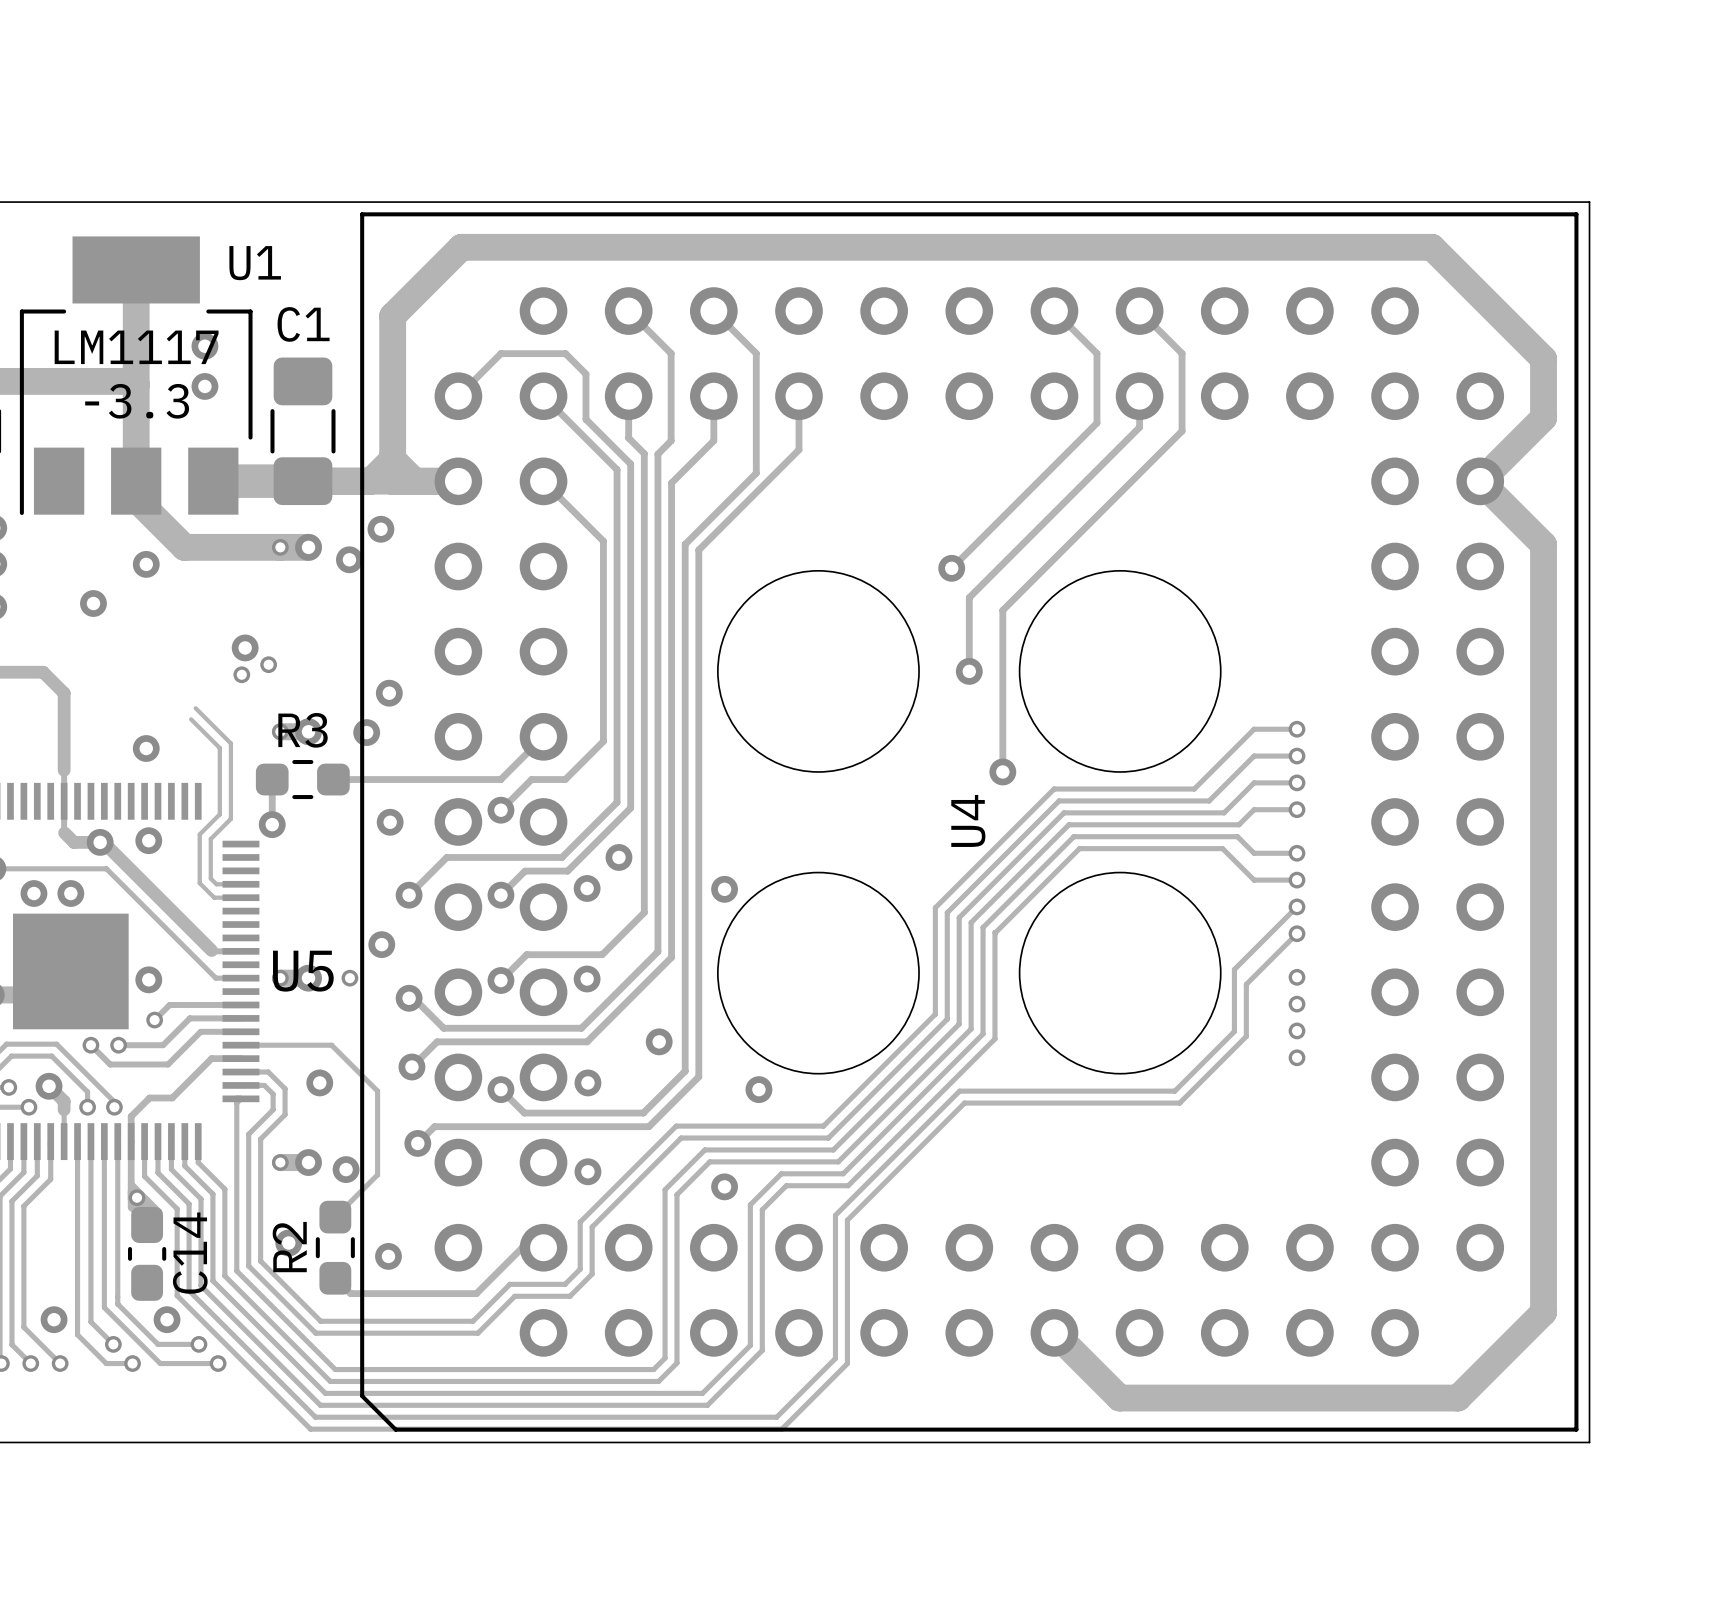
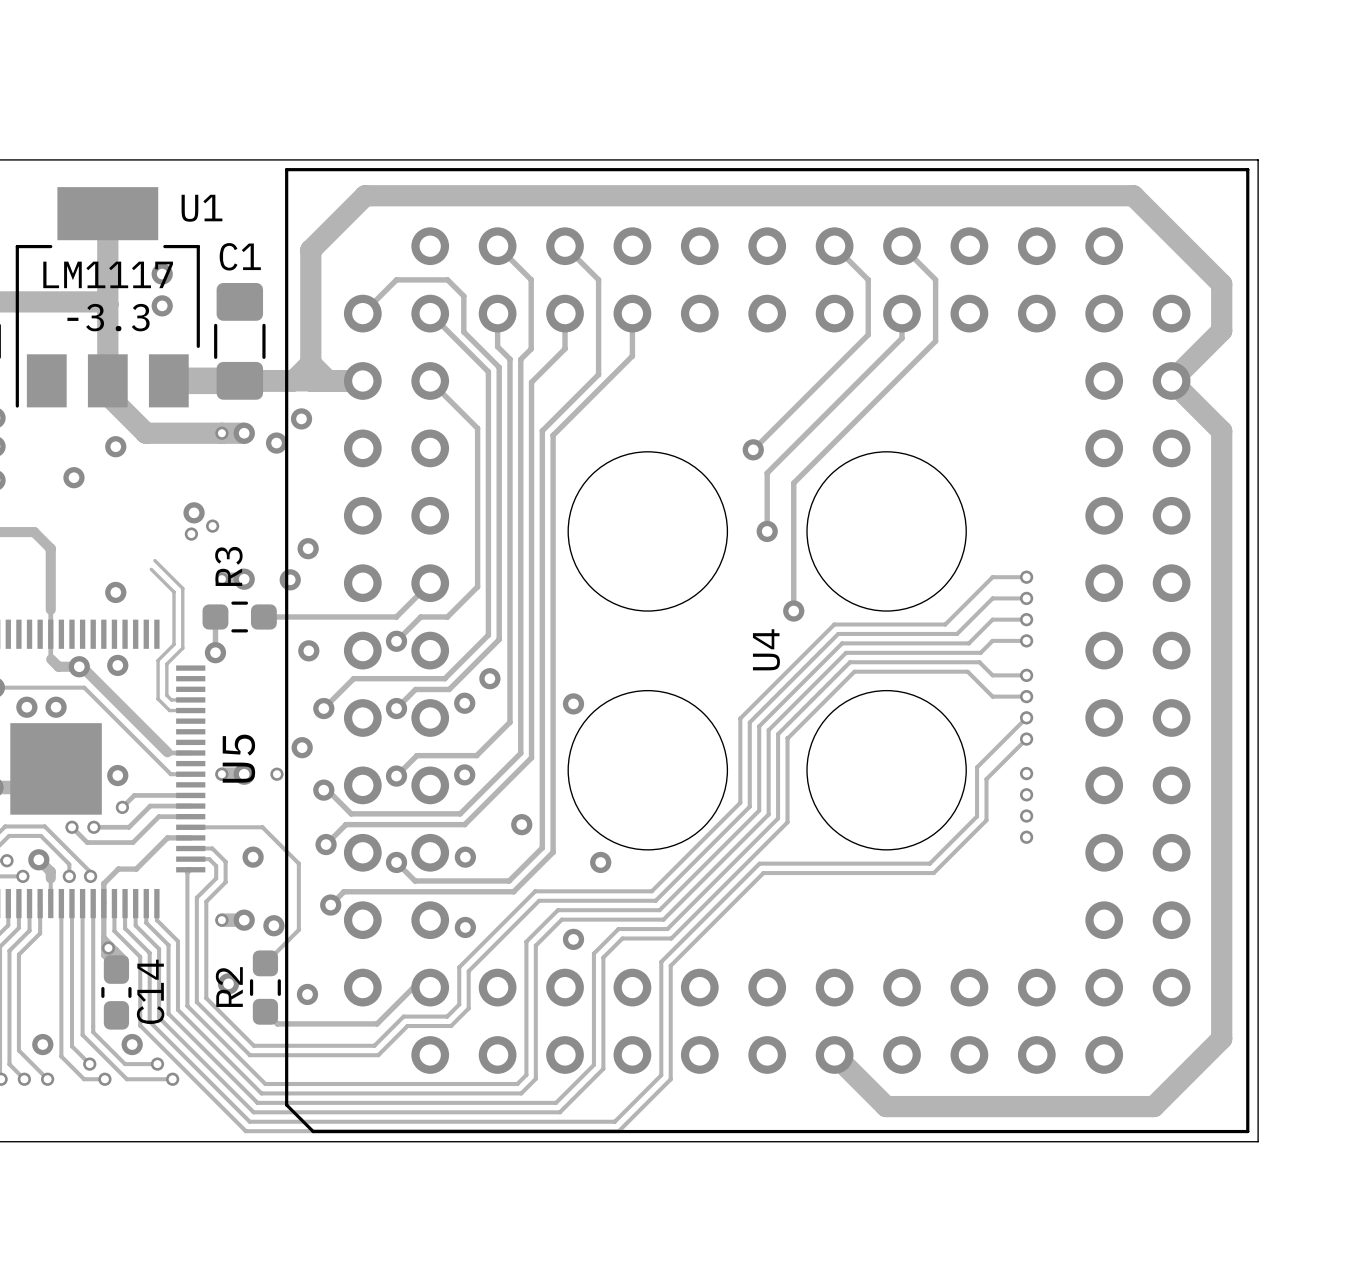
R3 name rotation: 0° (303, 730) -> 90° counterclockwise (228, 566)
U5 name rotation: 0° (303, 971) -> 90° counterclockwise (238, 758)

